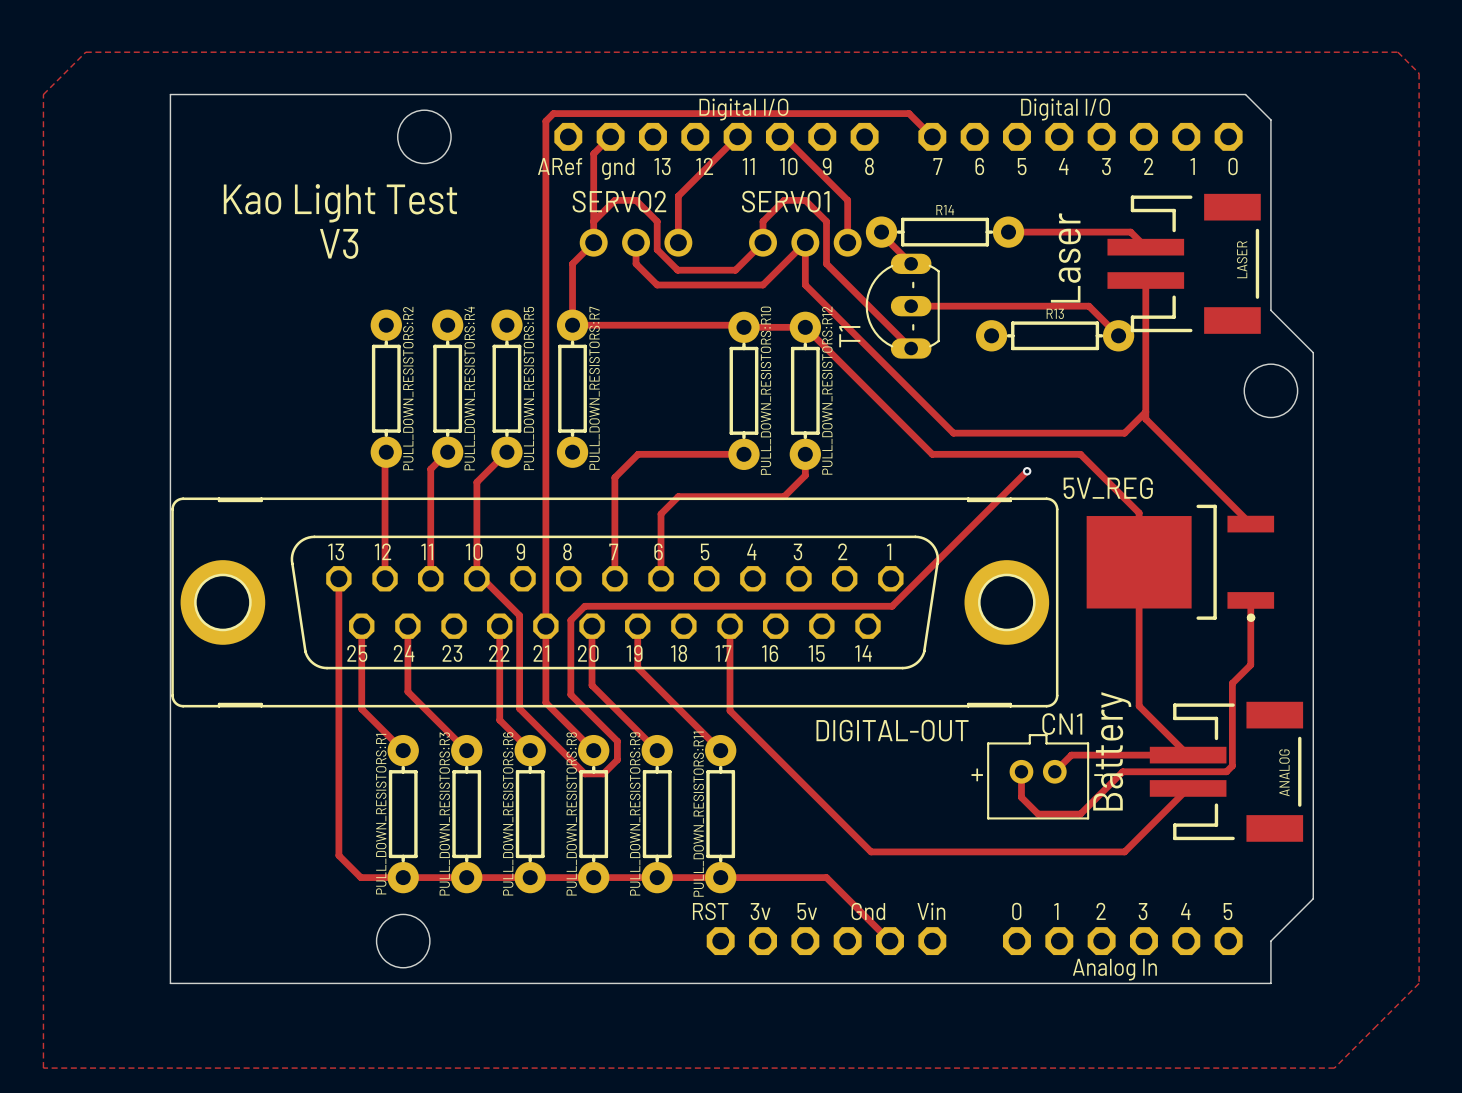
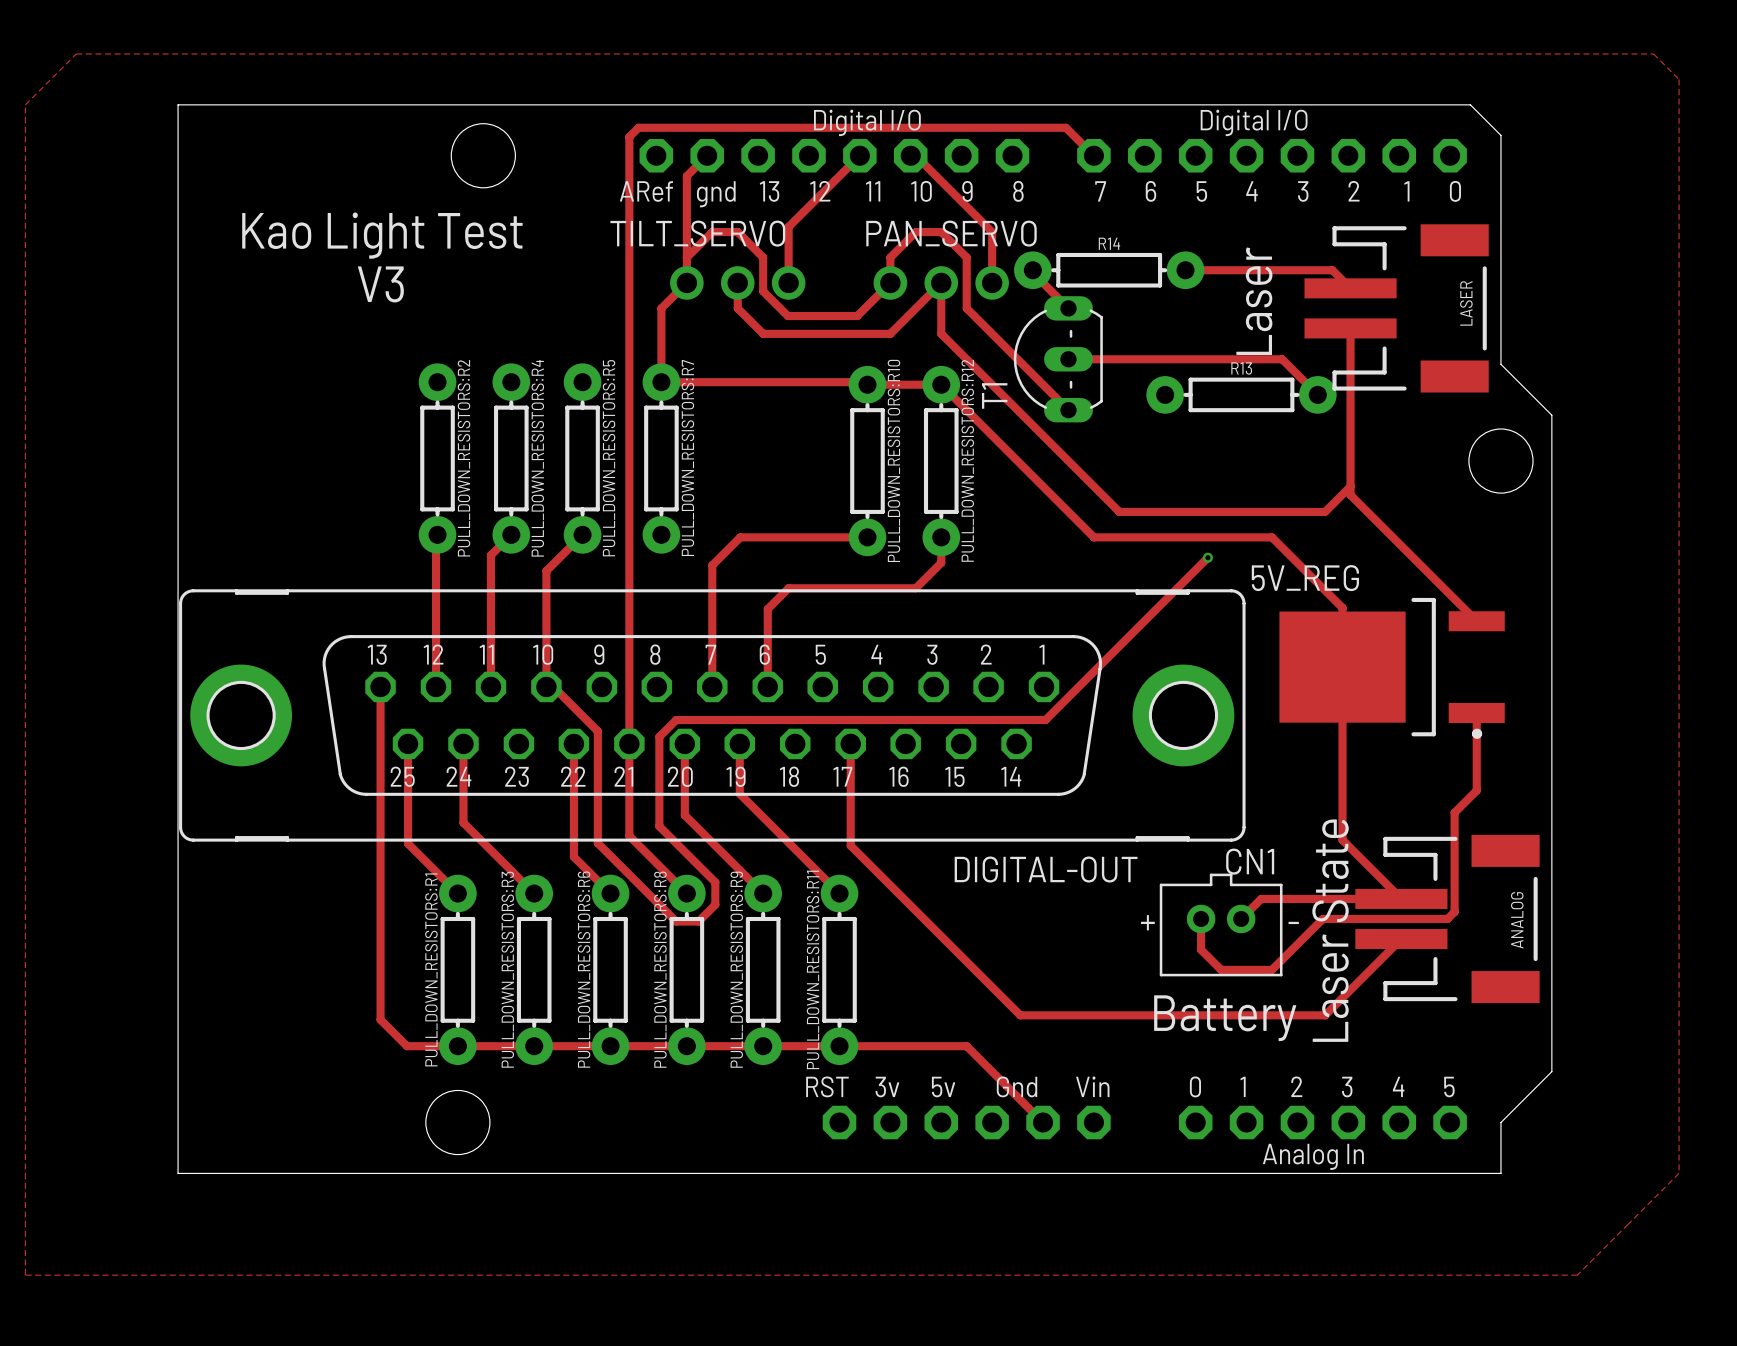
SERVO2 name: SERVO2 (619, 201) -> TILT_SERVO (697, 233)
SERVO1 name: SERVO1 (785, 201) -> PAN_SERVO (951, 233)
text rotation: 0° (1112, 751) -> 90° clockwise (1225, 1018)
text: none -> Laser State (1330, 930)

